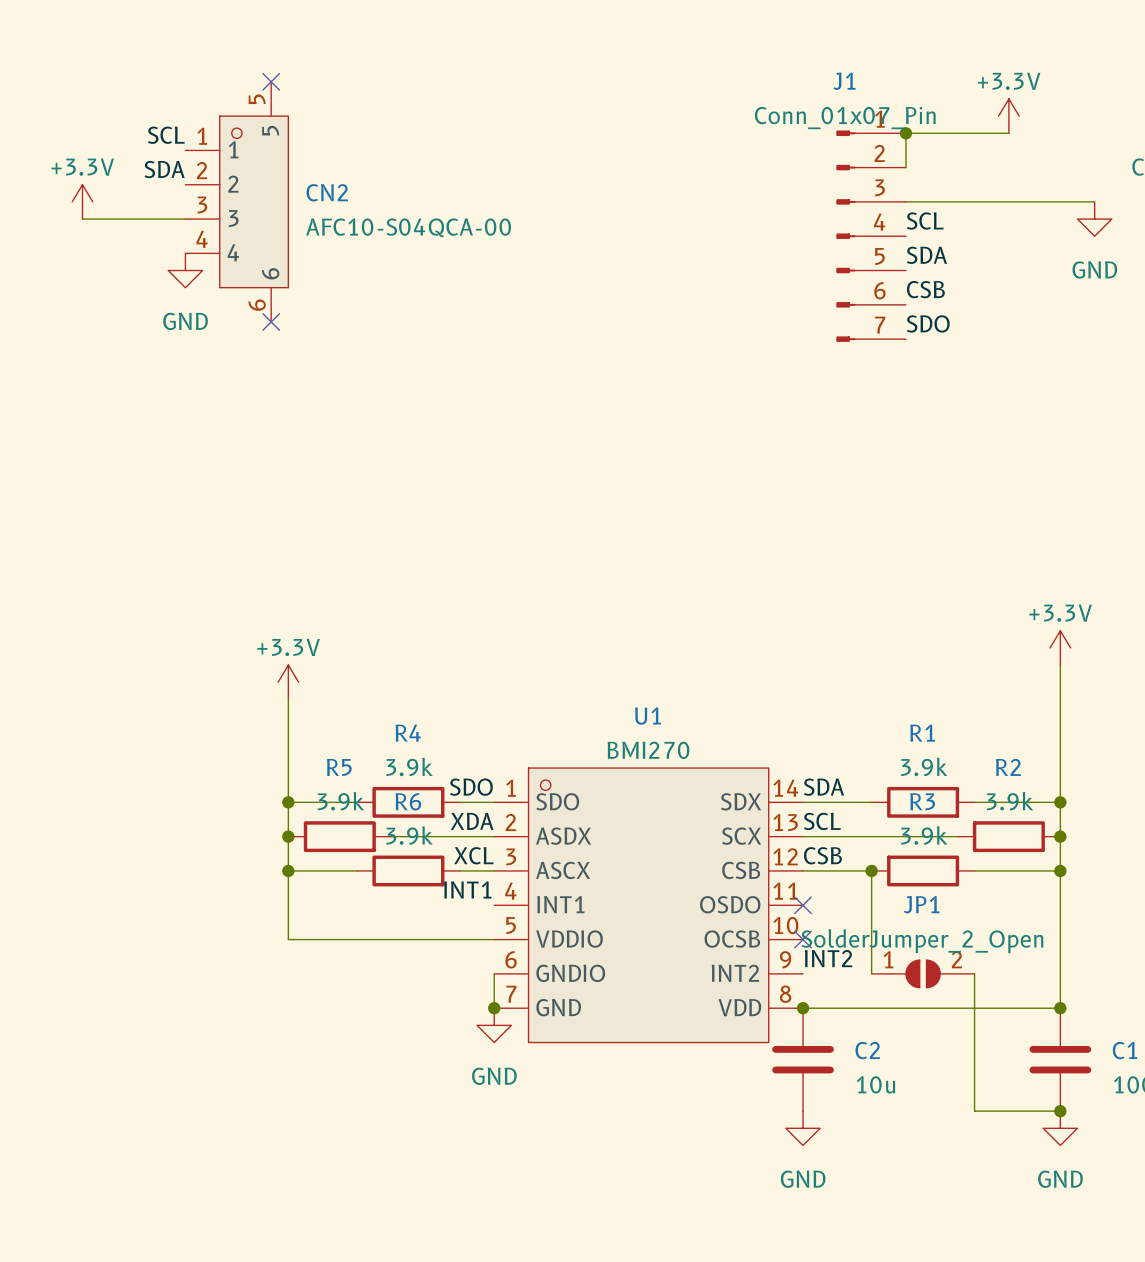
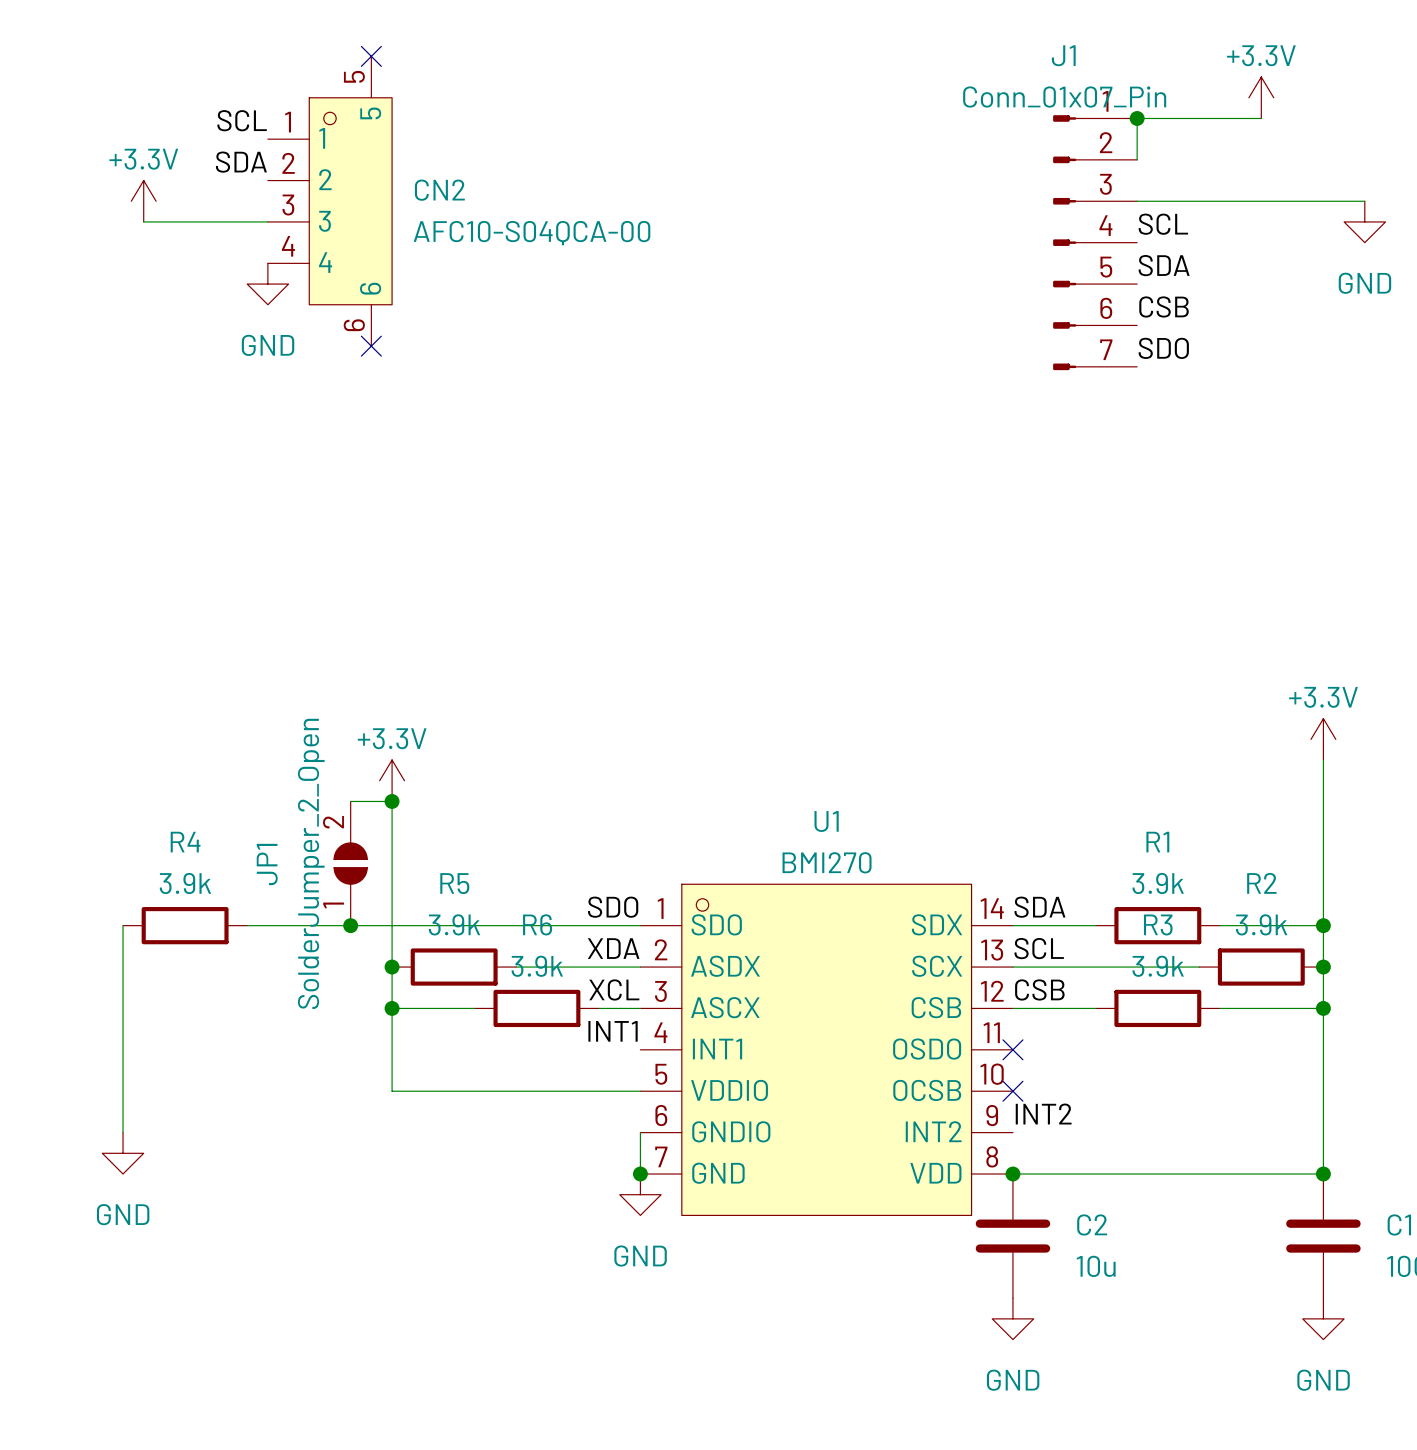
wire: none -> (350, 801) (392, 801)
junction: none -> (392, 801)
wire: none -> (123, 925) (123, 1132)
wire: none -> (247, 925) (392, 925)
junction position: (288, 802) -> (350, 925)
wire: none -> (474, 925) (599, 925)
R4 position: (408, 802) -> (185, 925)
wire: (871, 870) (871, 973) -> none
junction: (871, 870) -> none
JP1 rotation: 0° (923, 973) -> 90° counterclockwise (350, 863)
JP1 position: (923, 973) -> (350, 863)
wire: (974, 973) (974, 1111) (1060, 1111) -> none
power symbol: none -> GND (123, 1153)
junction: (1060, 1111) -> none

